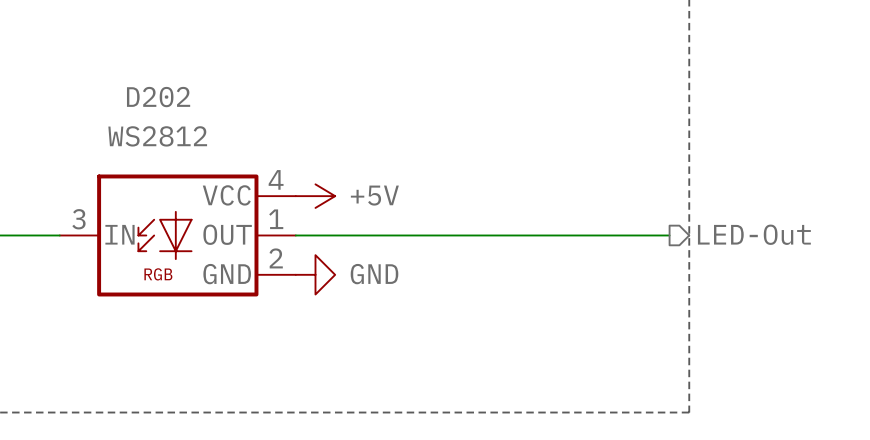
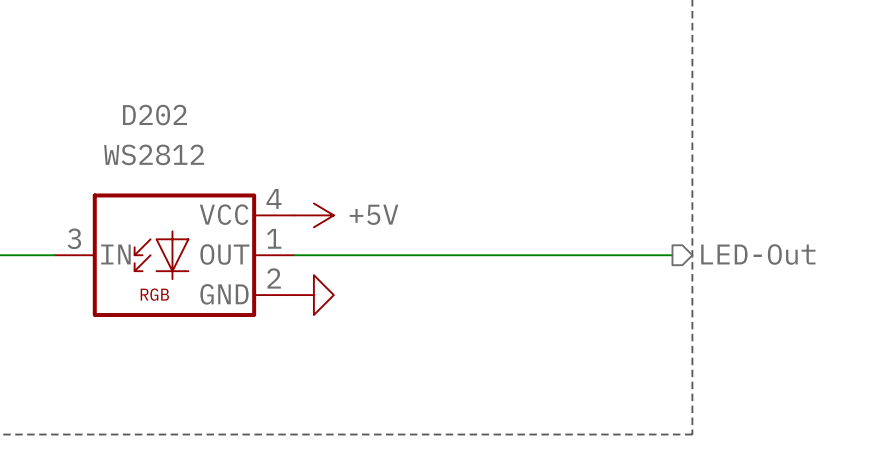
power symbol text: GND (374, 274) -> none

